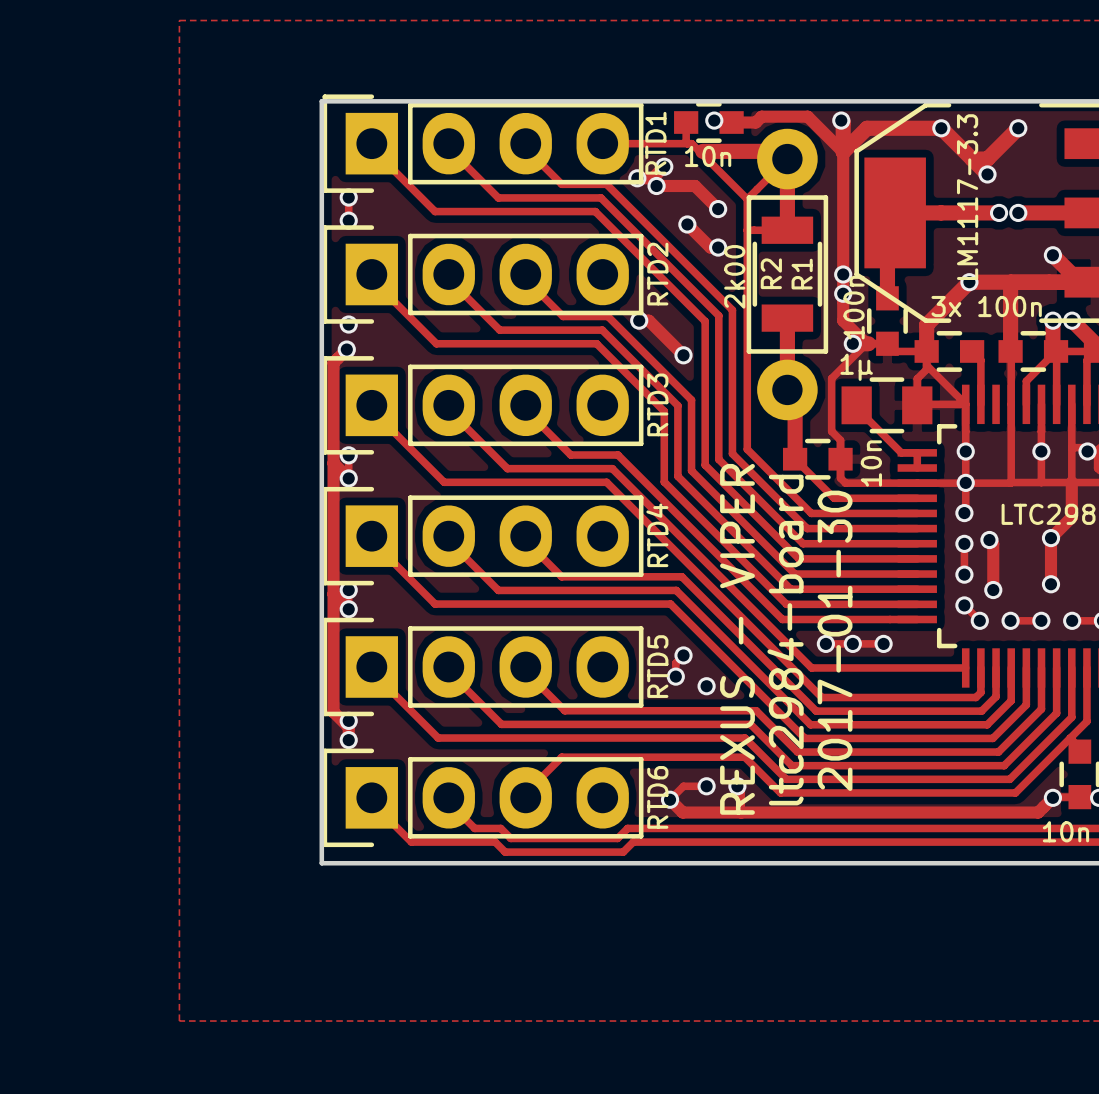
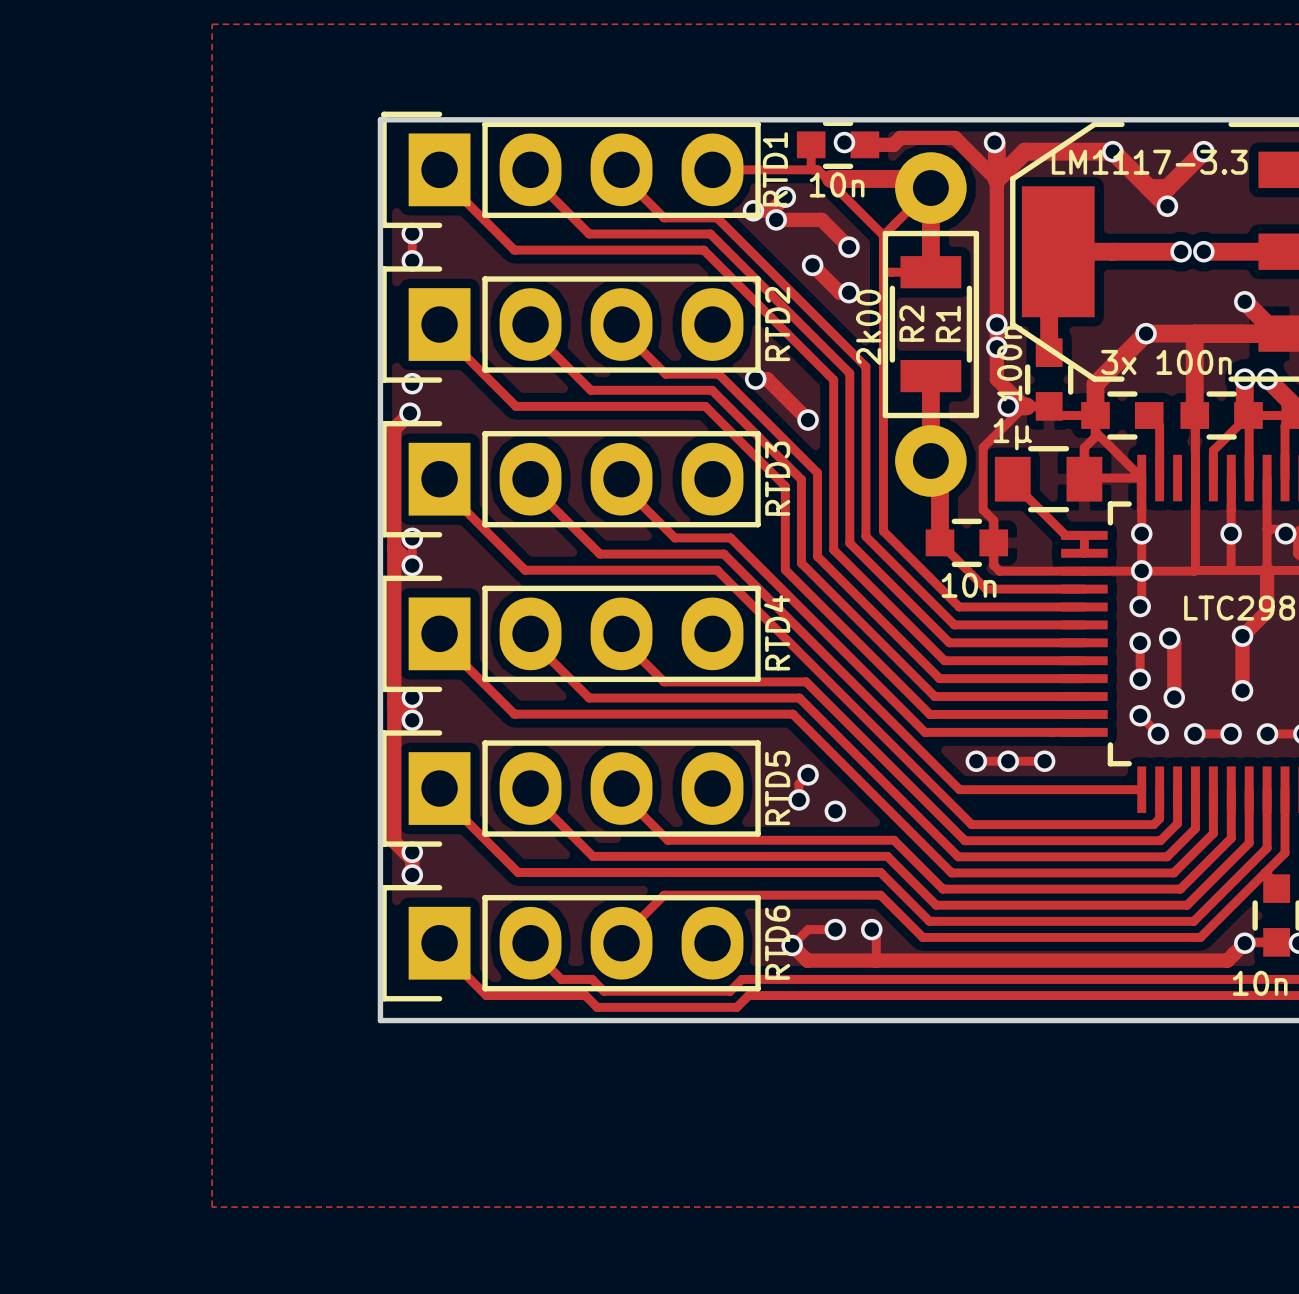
part value rotation: 0° (967, 197) -> 90° clockwise (1149, 162)
part value rotation: 0° (871, 463) -> 90° clockwise (969, 585)
text: REXUS - VIPER (737, 639) -> none
text: ltc2984-board (785, 640) -> none
text: 2017-01-30 (835, 640) -> none

